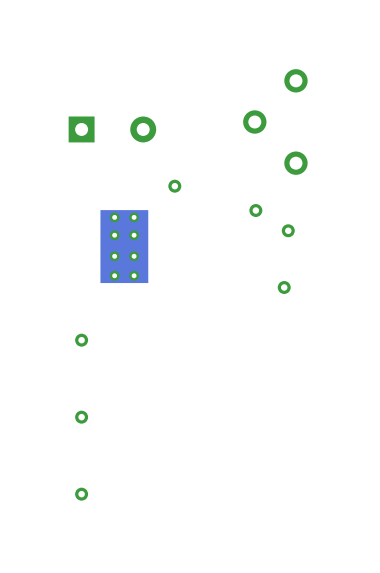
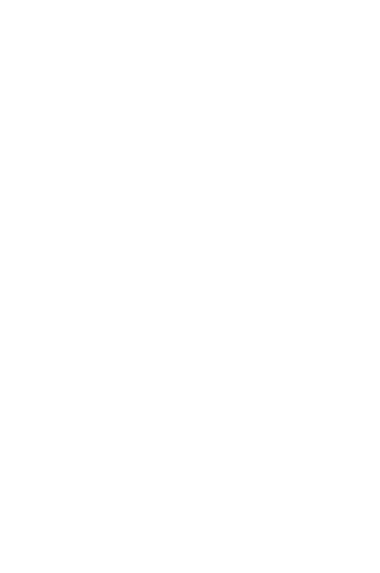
part: (275, 122) -> none
part: (112, 129) -> none
via: (174, 186) -> none
via: (255, 210) -> none
via: (288, 230) -> none
part: (124, 246) -> none
via: (284, 287) -> none
via: (81, 340) -> none
via: (81, 417) -> none
via: (81, 494) -> none

